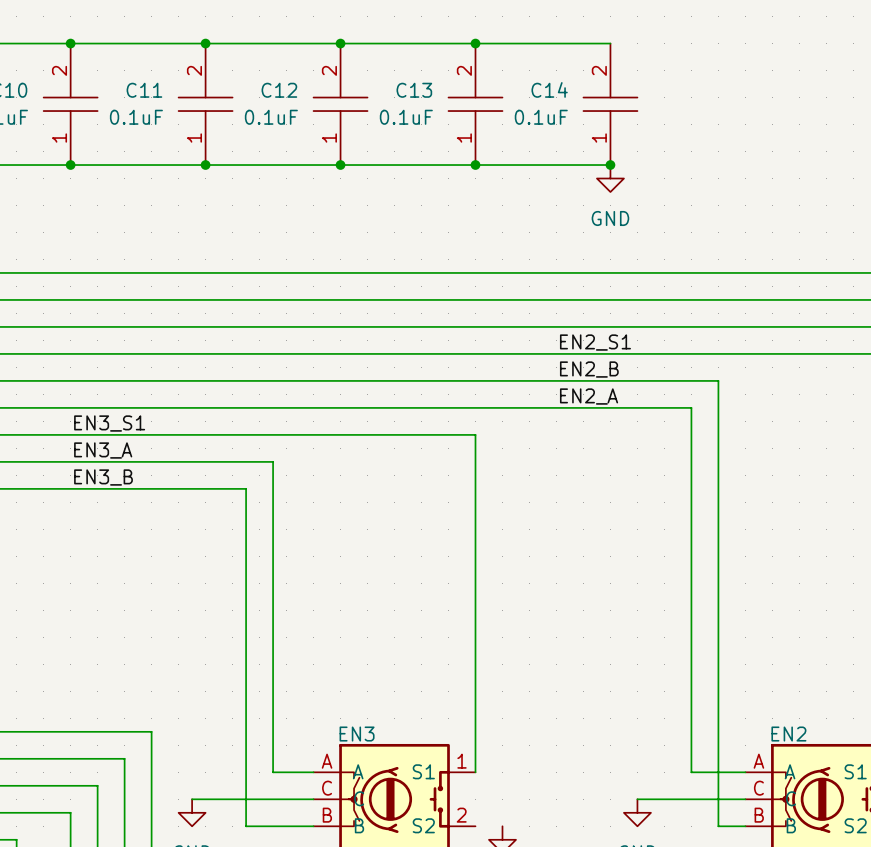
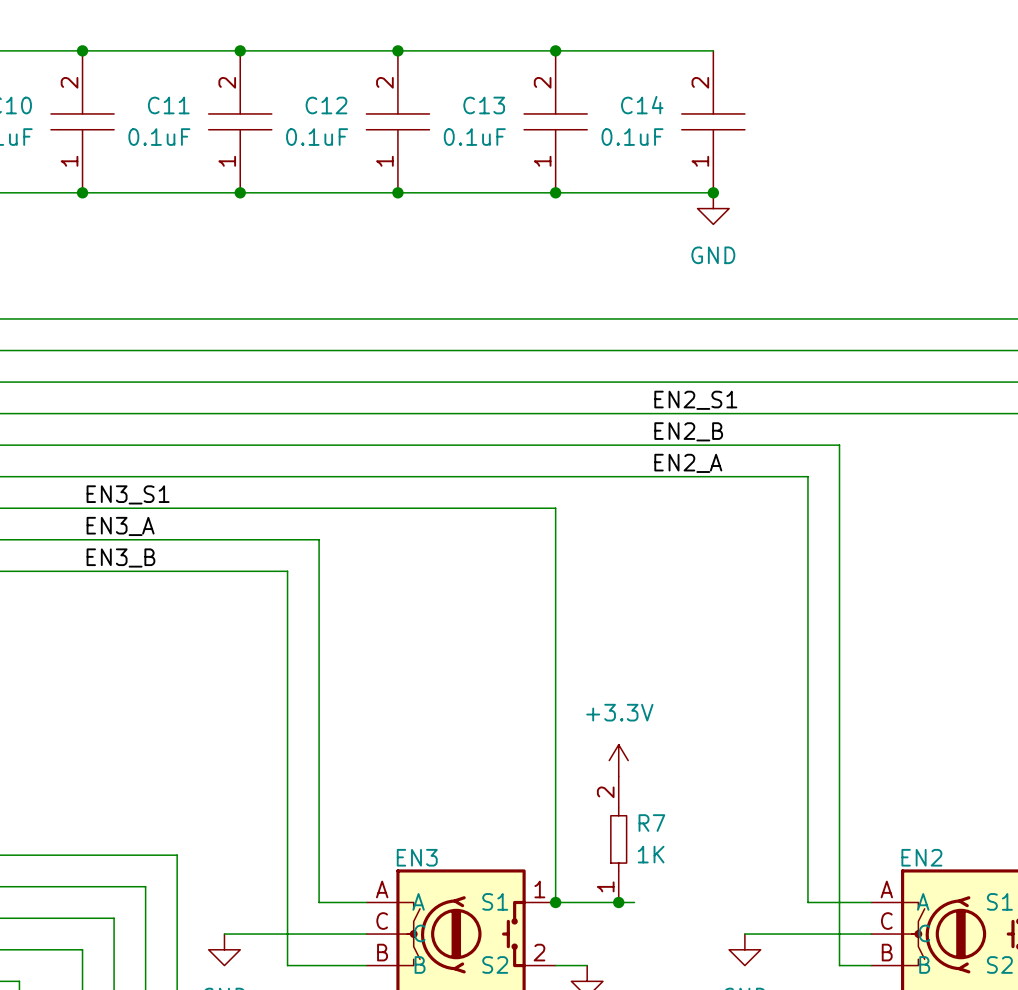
power symbol: none -> +3.3V (618, 760)
R7: none -> (618, 839)
wire: none -> (555, 902) (634, 902)
junction: none -> (555, 902)
junction: none -> (618, 902)
wire: none -> (555, 965) (587, 965)

